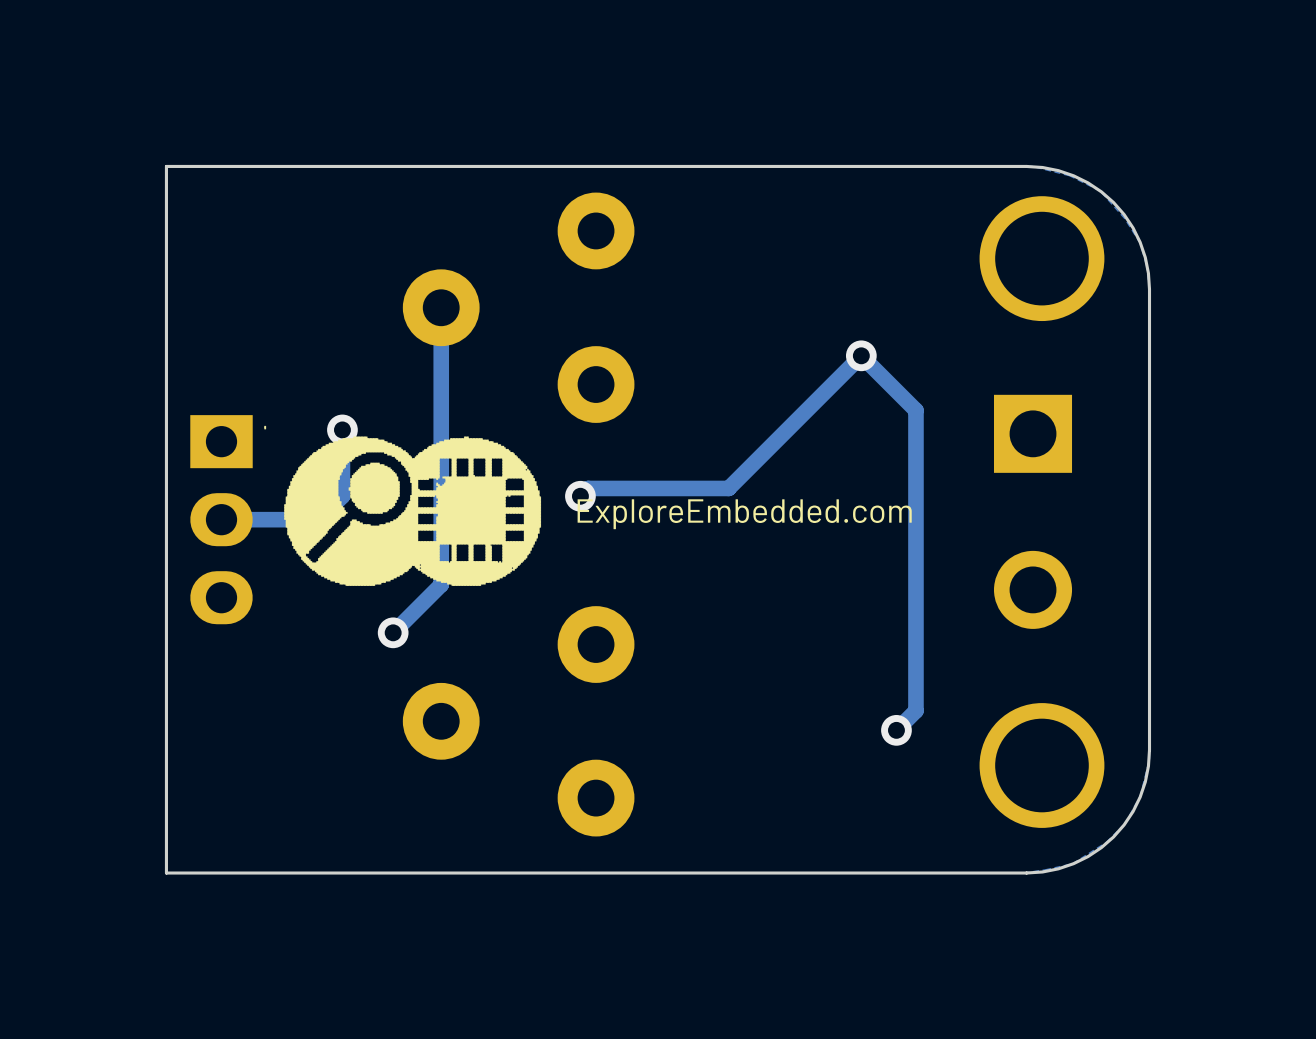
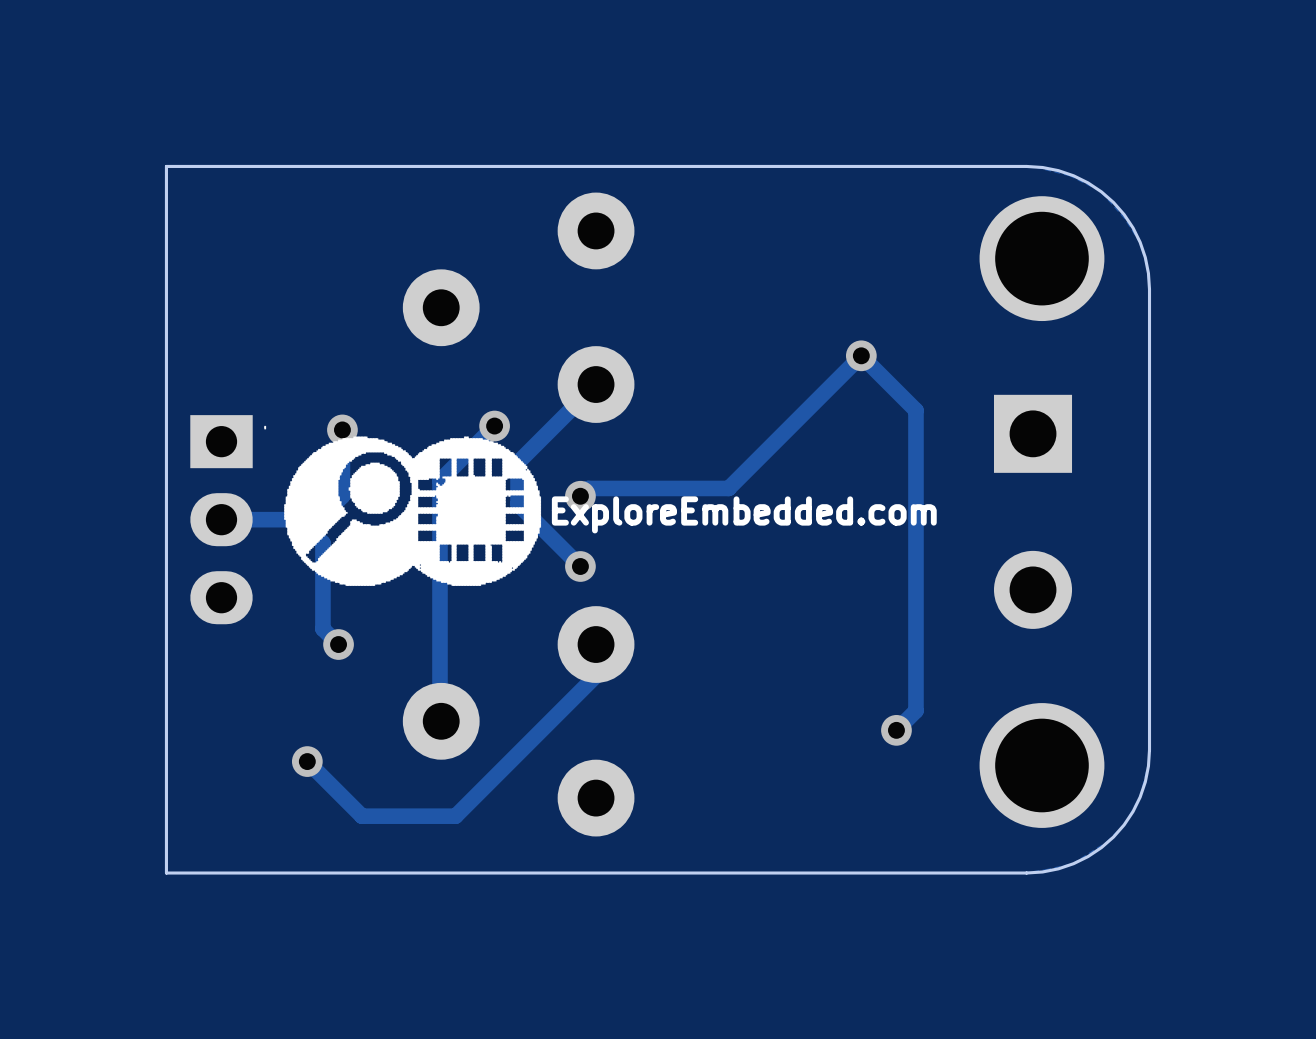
track: (441, 307) (441, 584) (393, 632) -> none
track: none -> (596, 384) (518, 462) (518, 504) (580, 566)
track: none -> (494, 426) (439, 480) (441, 721)
via: none -> (494, 426)
track: none -> (299, 519) (322, 543) (322, 628) (338, 644)
via: none -> (580, 566)
via position: (393, 632) -> (338, 644)
track: none -> (596, 644) (596, 675) (455, 816) (361, 816) (307, 761)
via: none -> (307, 761)

